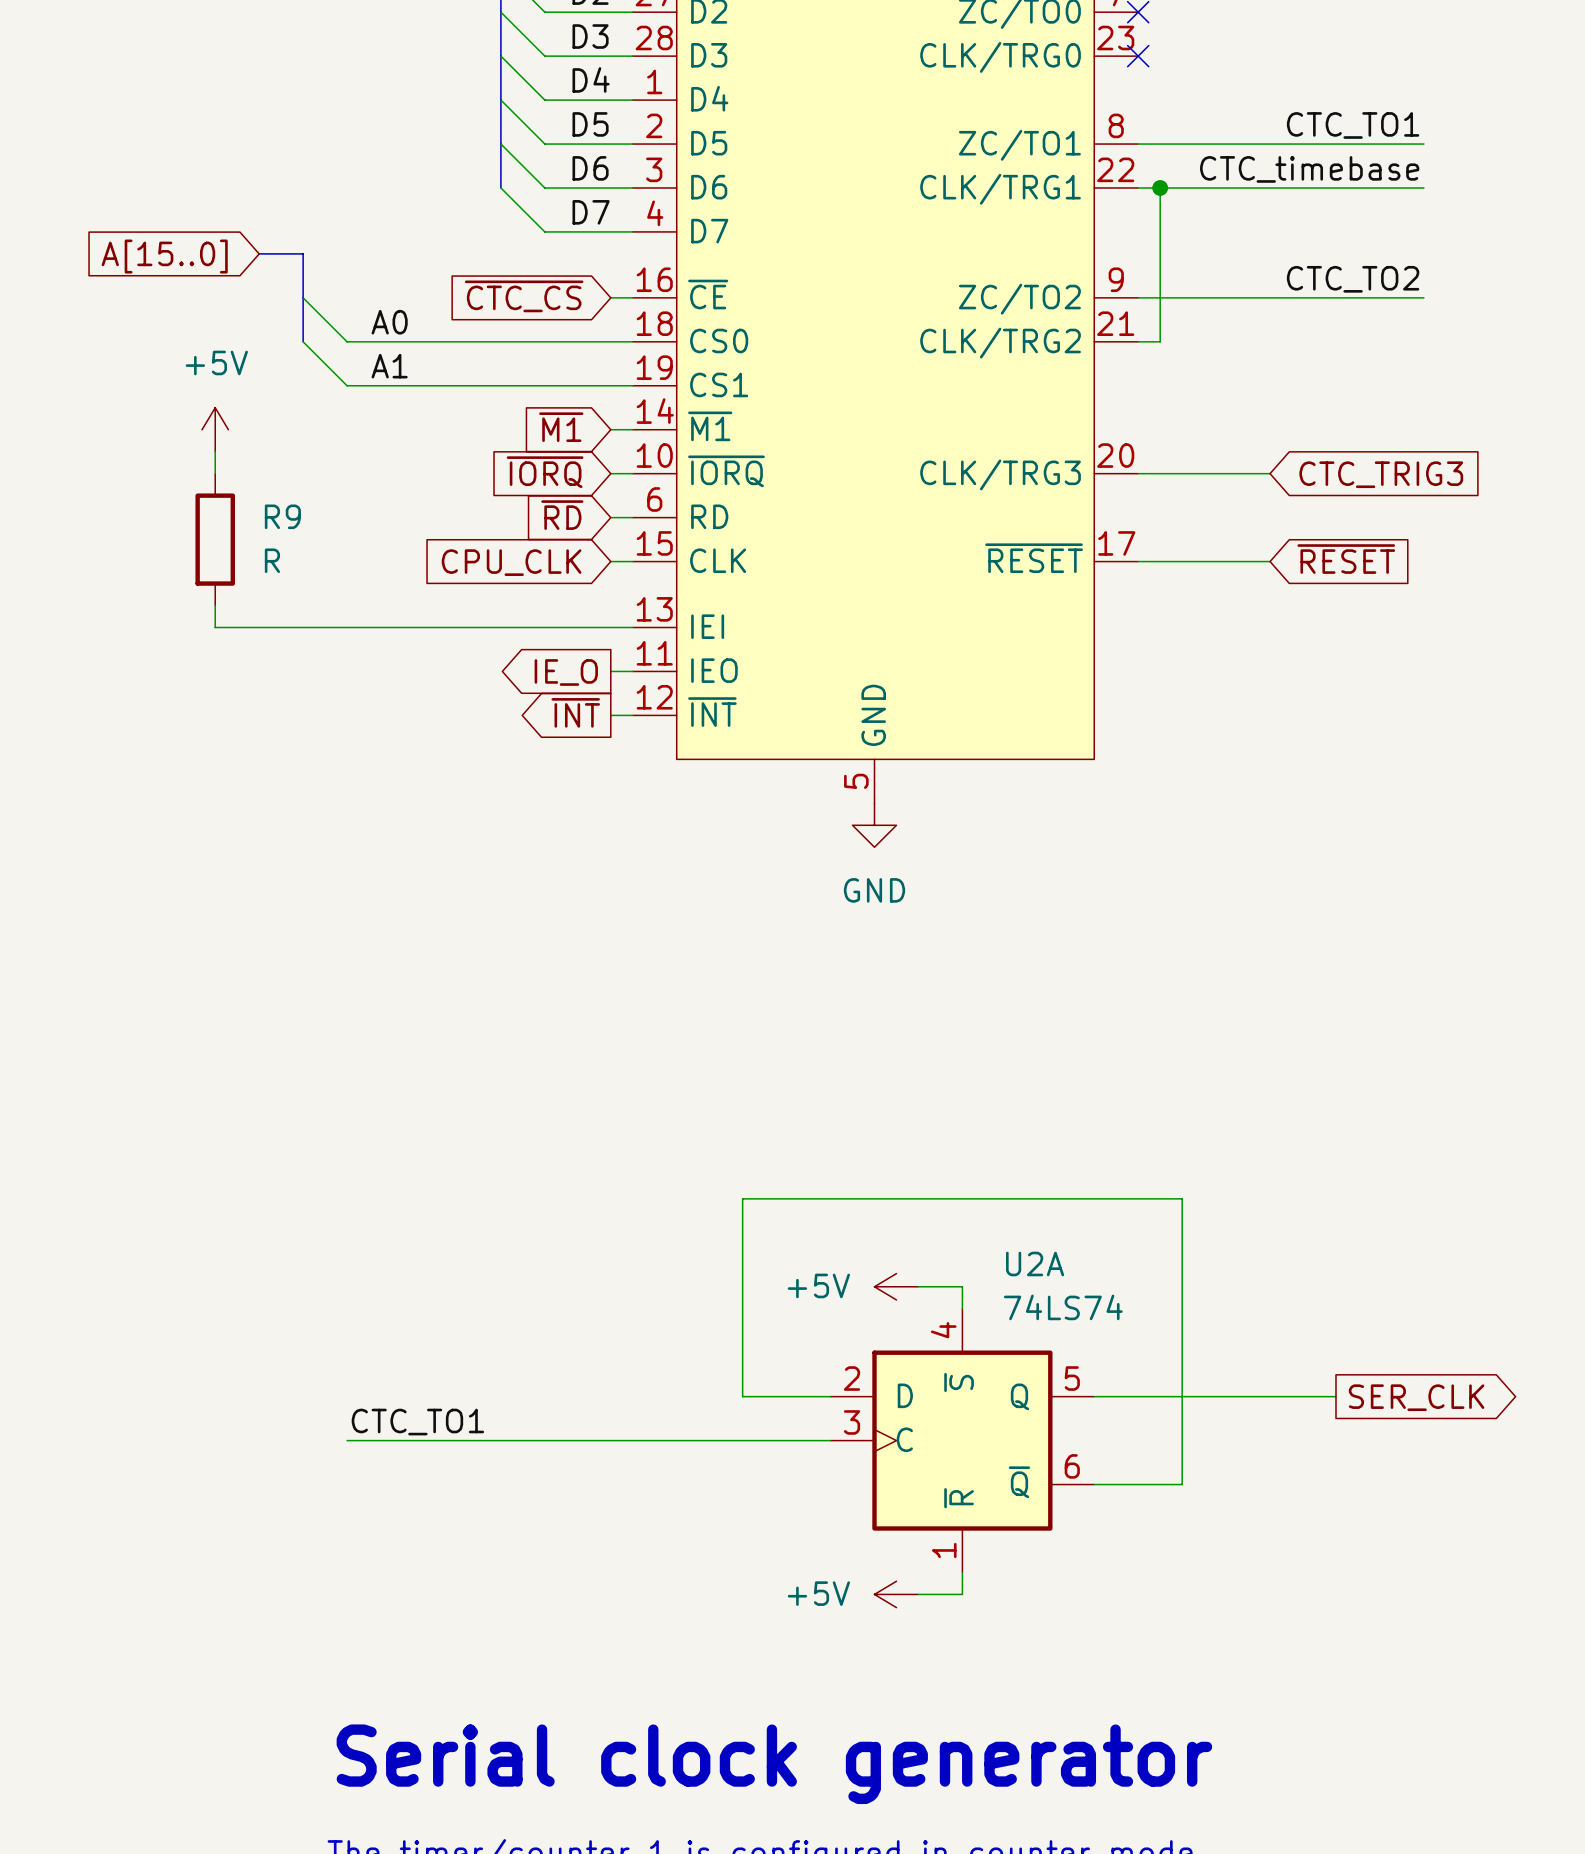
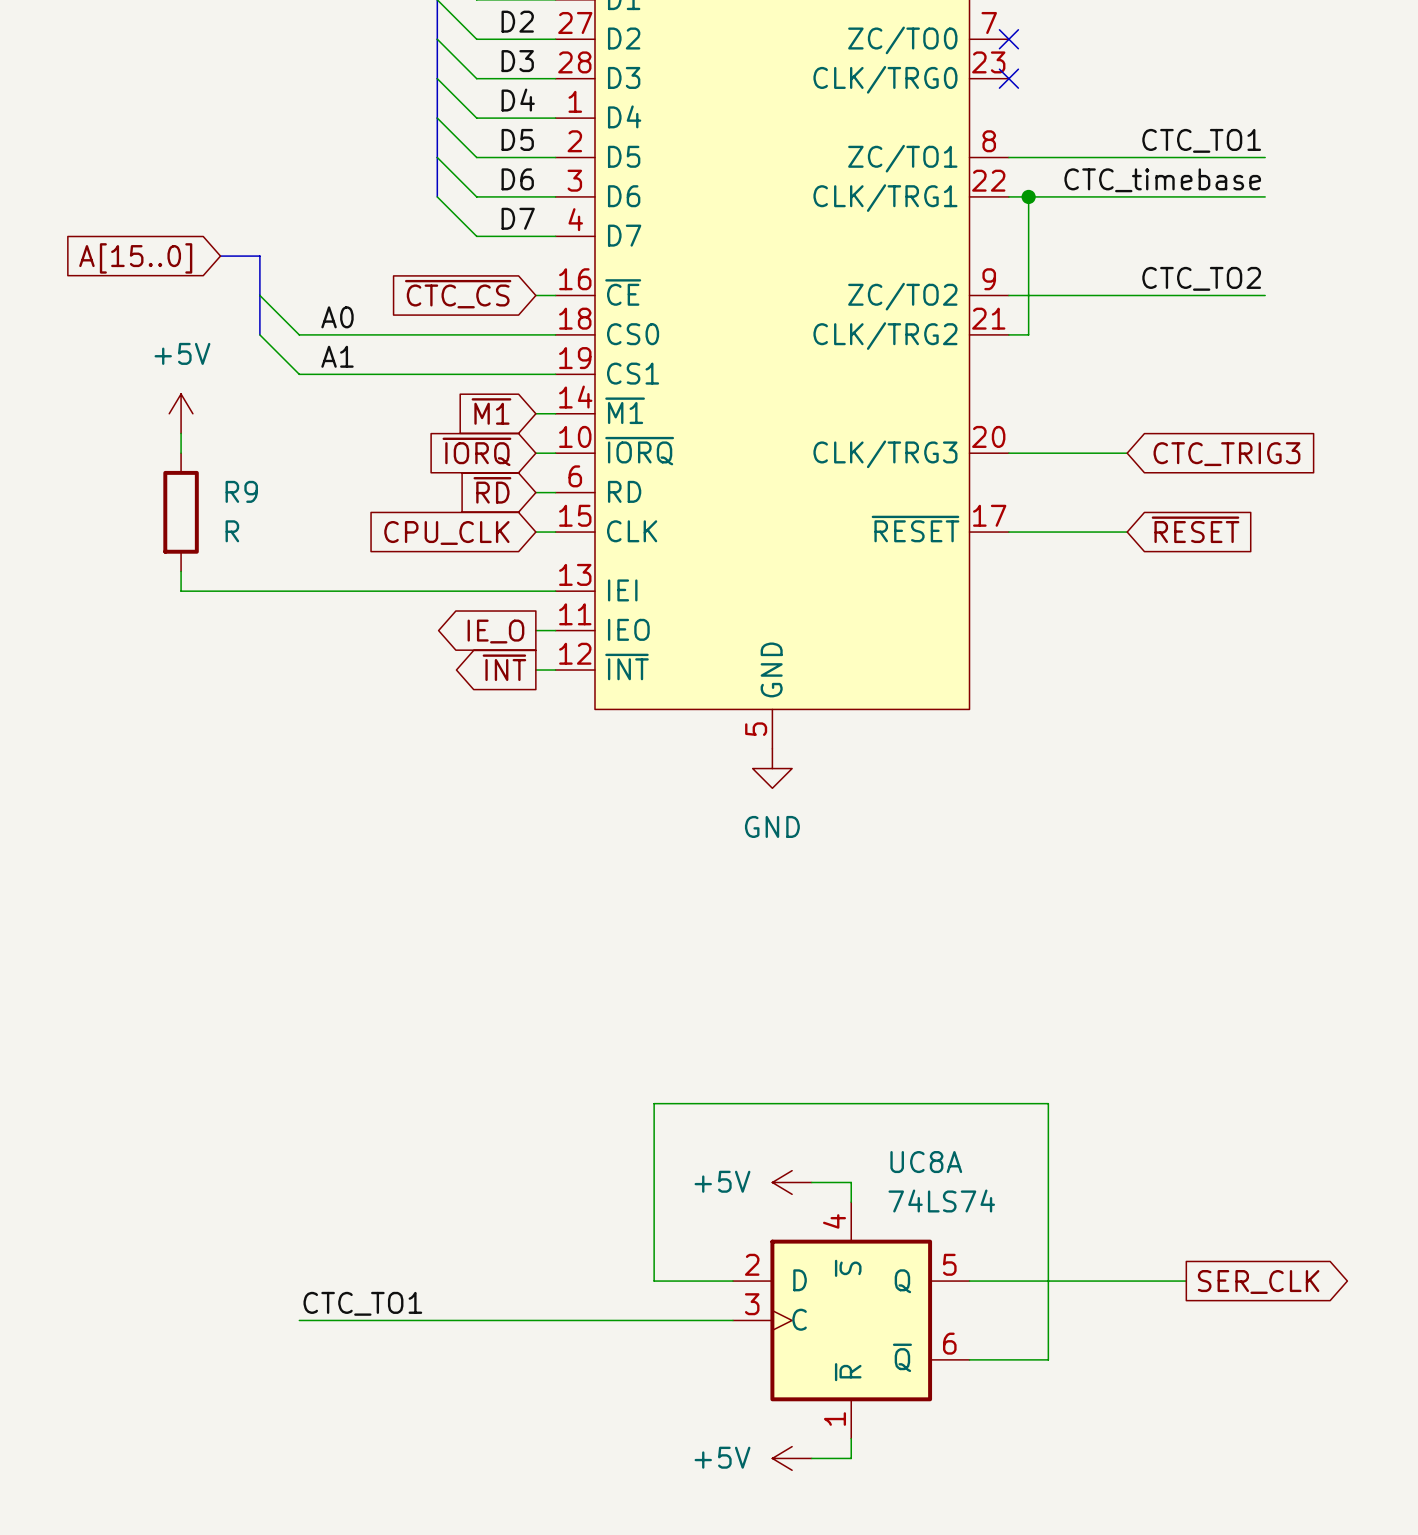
U2A name: U2A (1035, 1263) -> UC8A (926, 1162)

